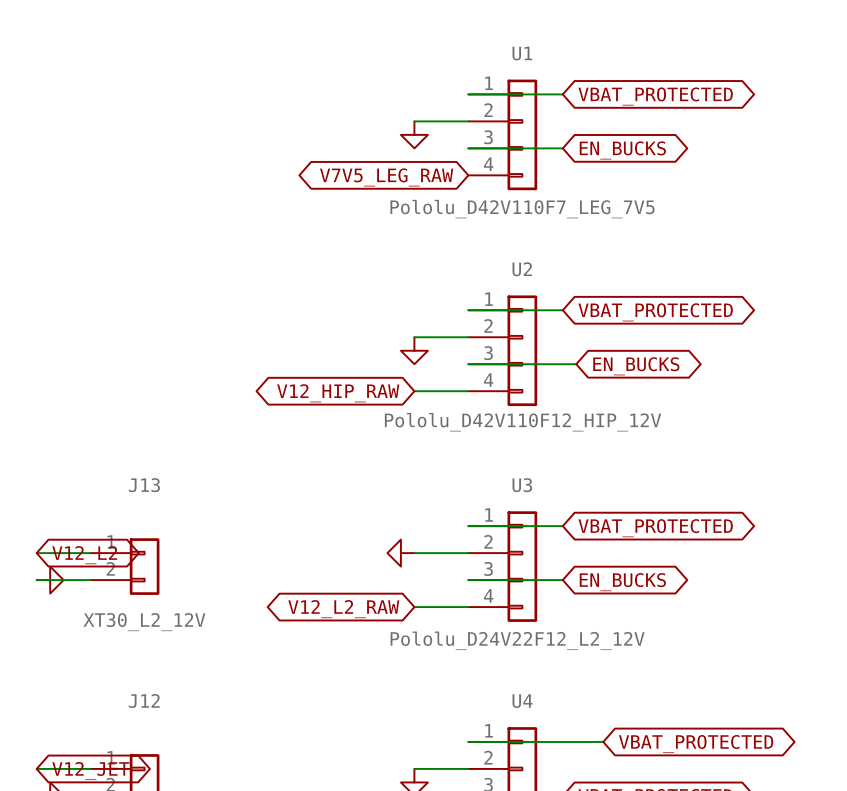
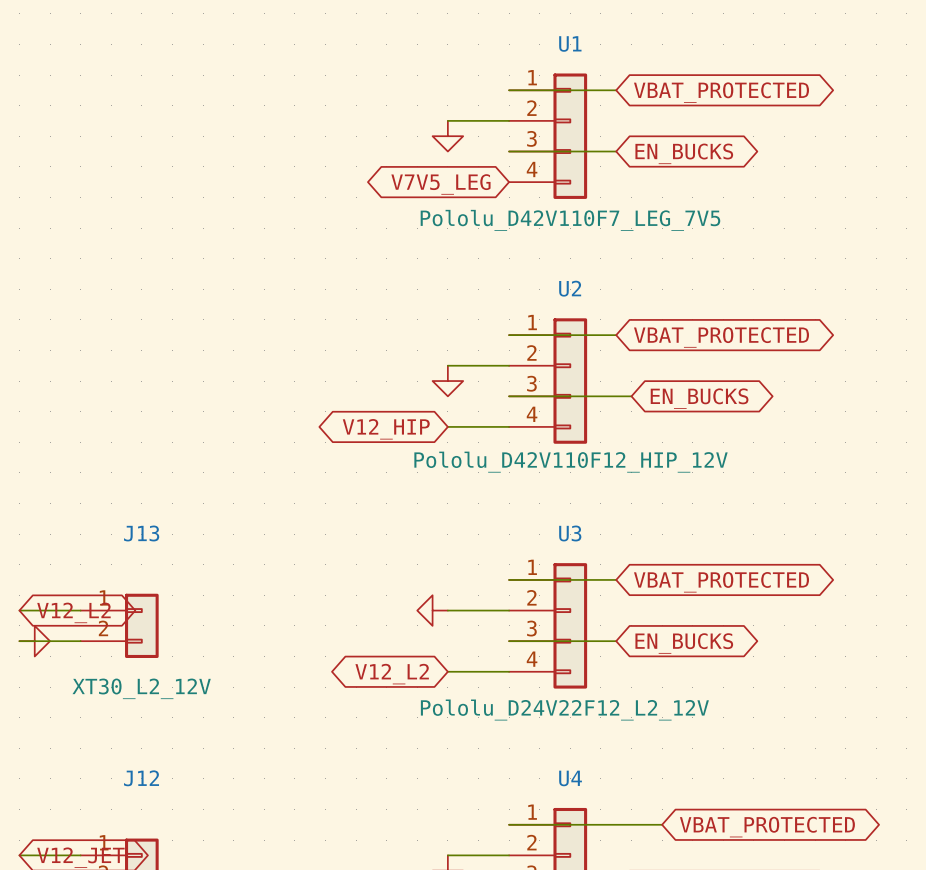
global label: V7V5_LEG_RAW (386, 177) -> V7V5_LEG (440, 184)
global label: V12_HIP_RAW (338, 393) -> V12_HIP (386, 429)
global label: V12_L2_RAW (343, 609) -> V12_L2 (392, 674)

